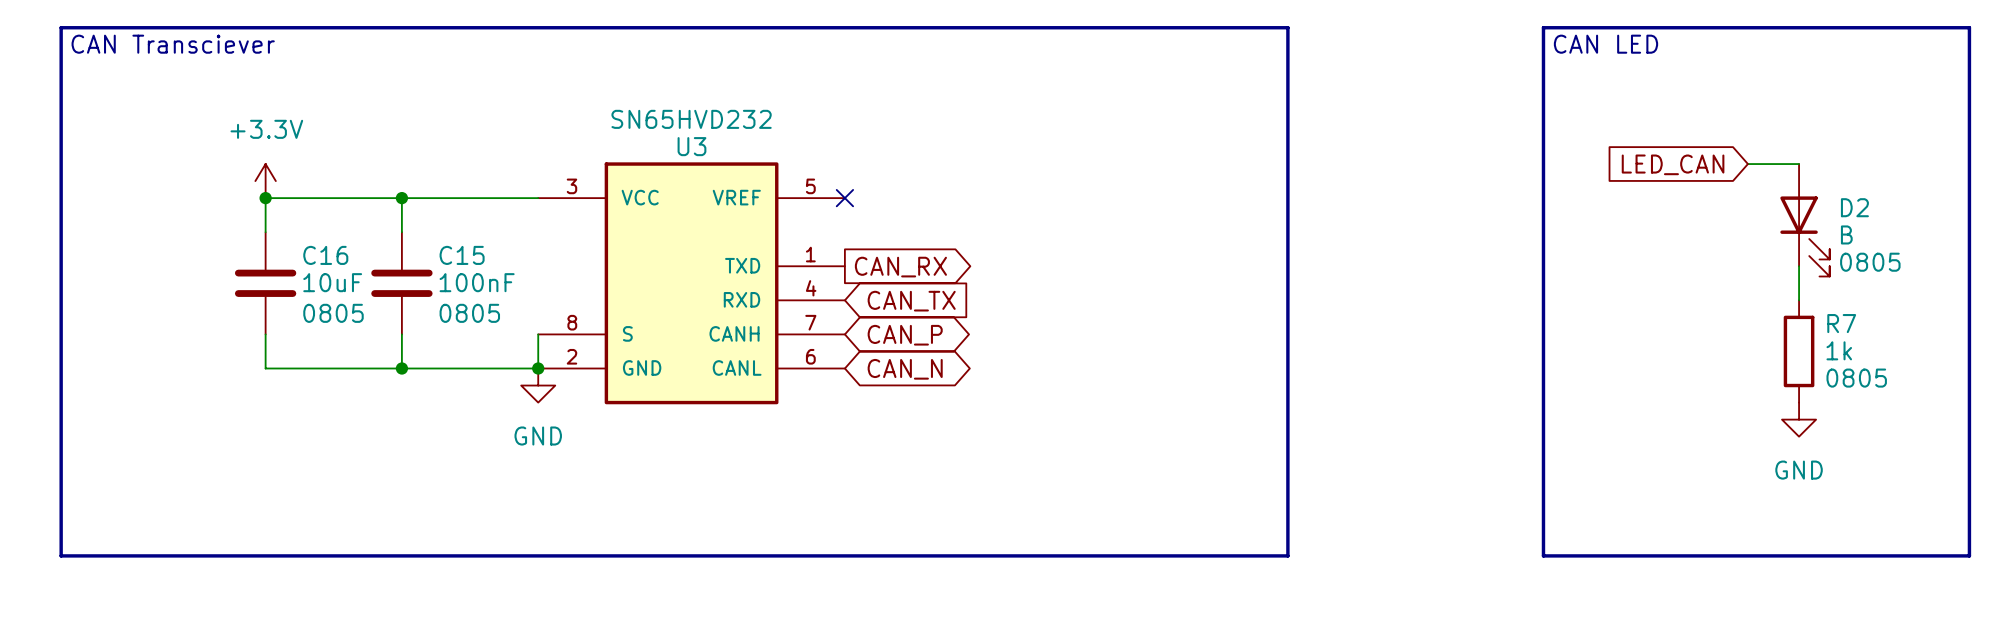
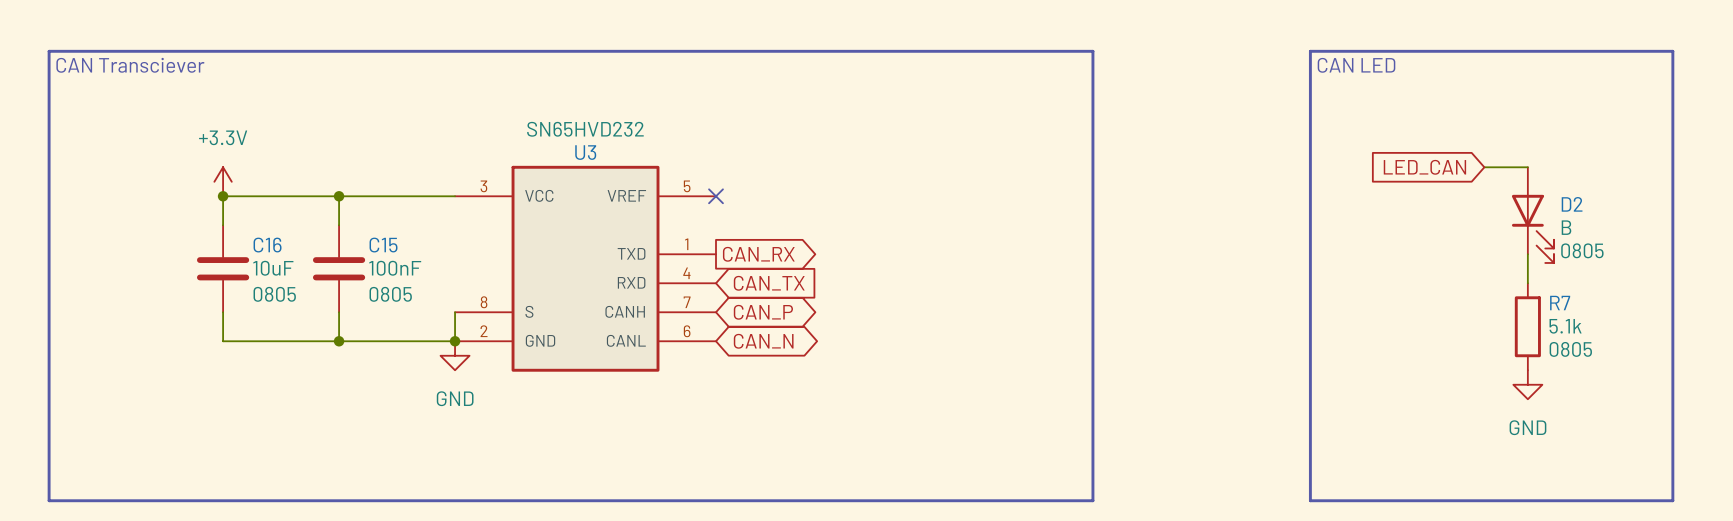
R7 value: 1k (1839, 350) -> 5.1k (1565, 326)

